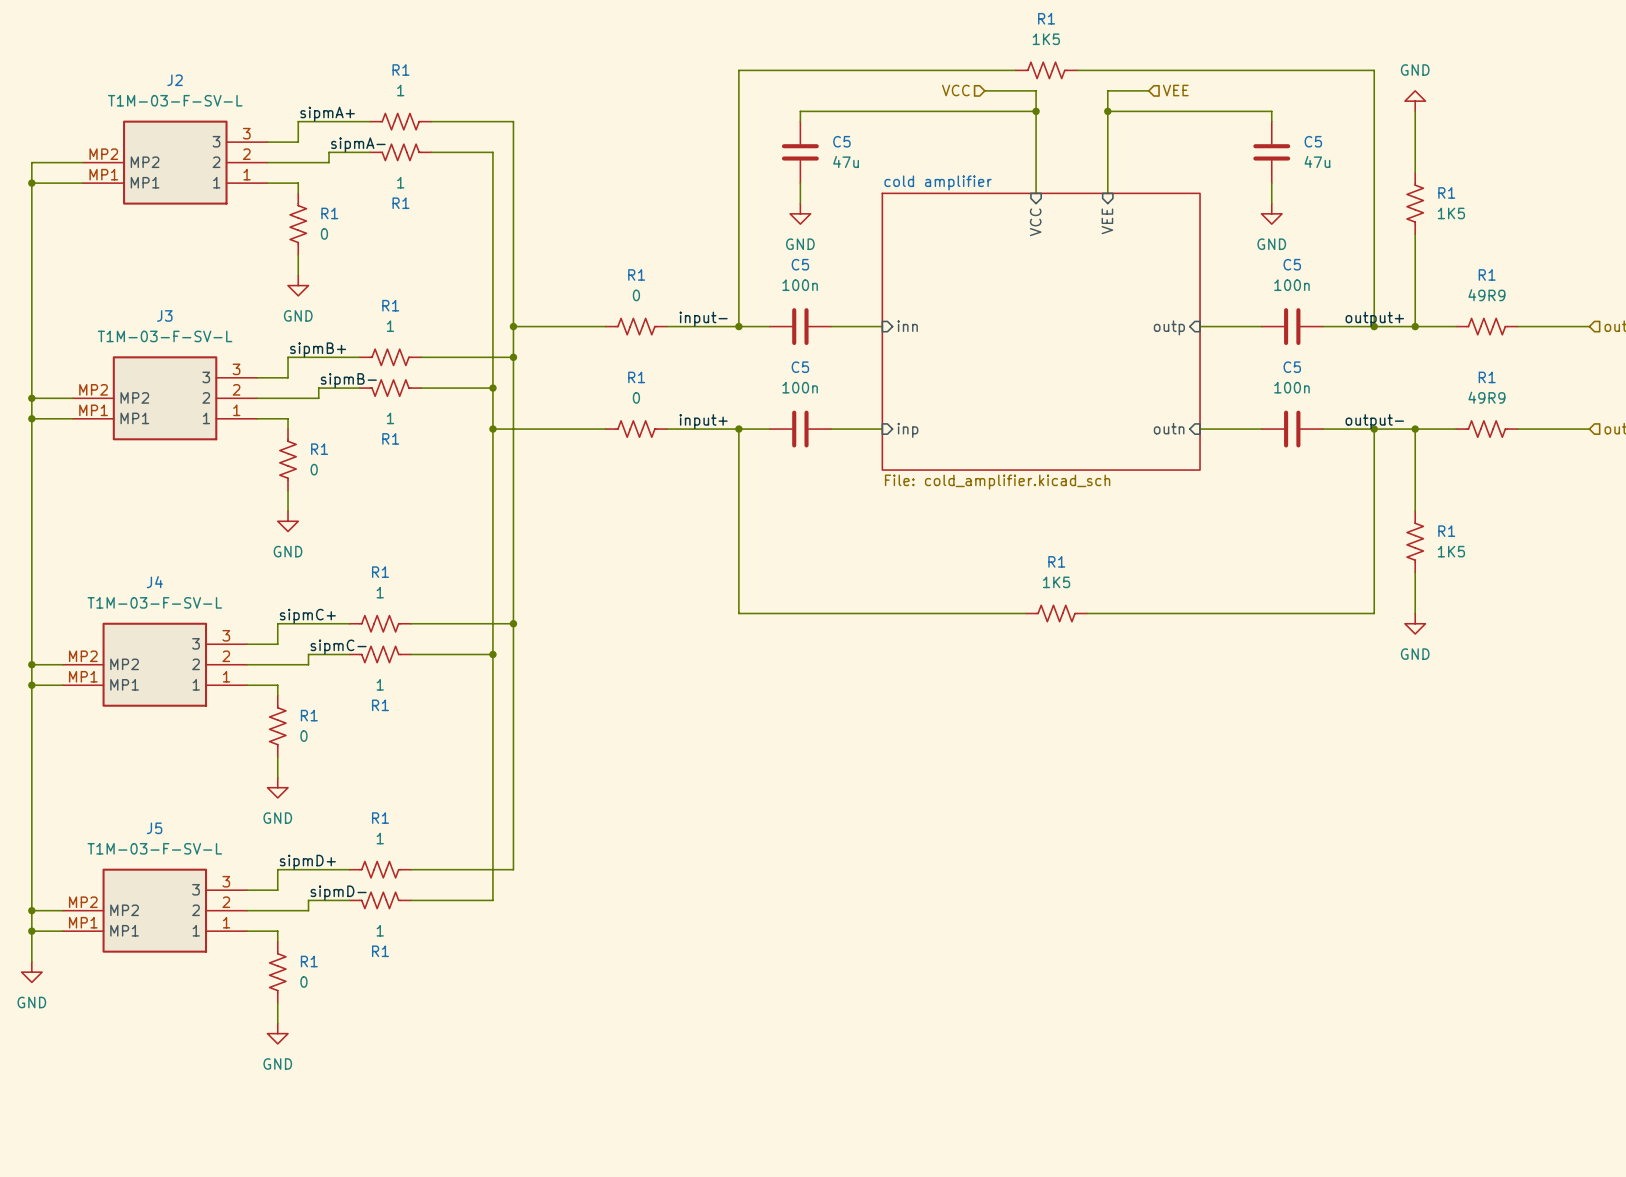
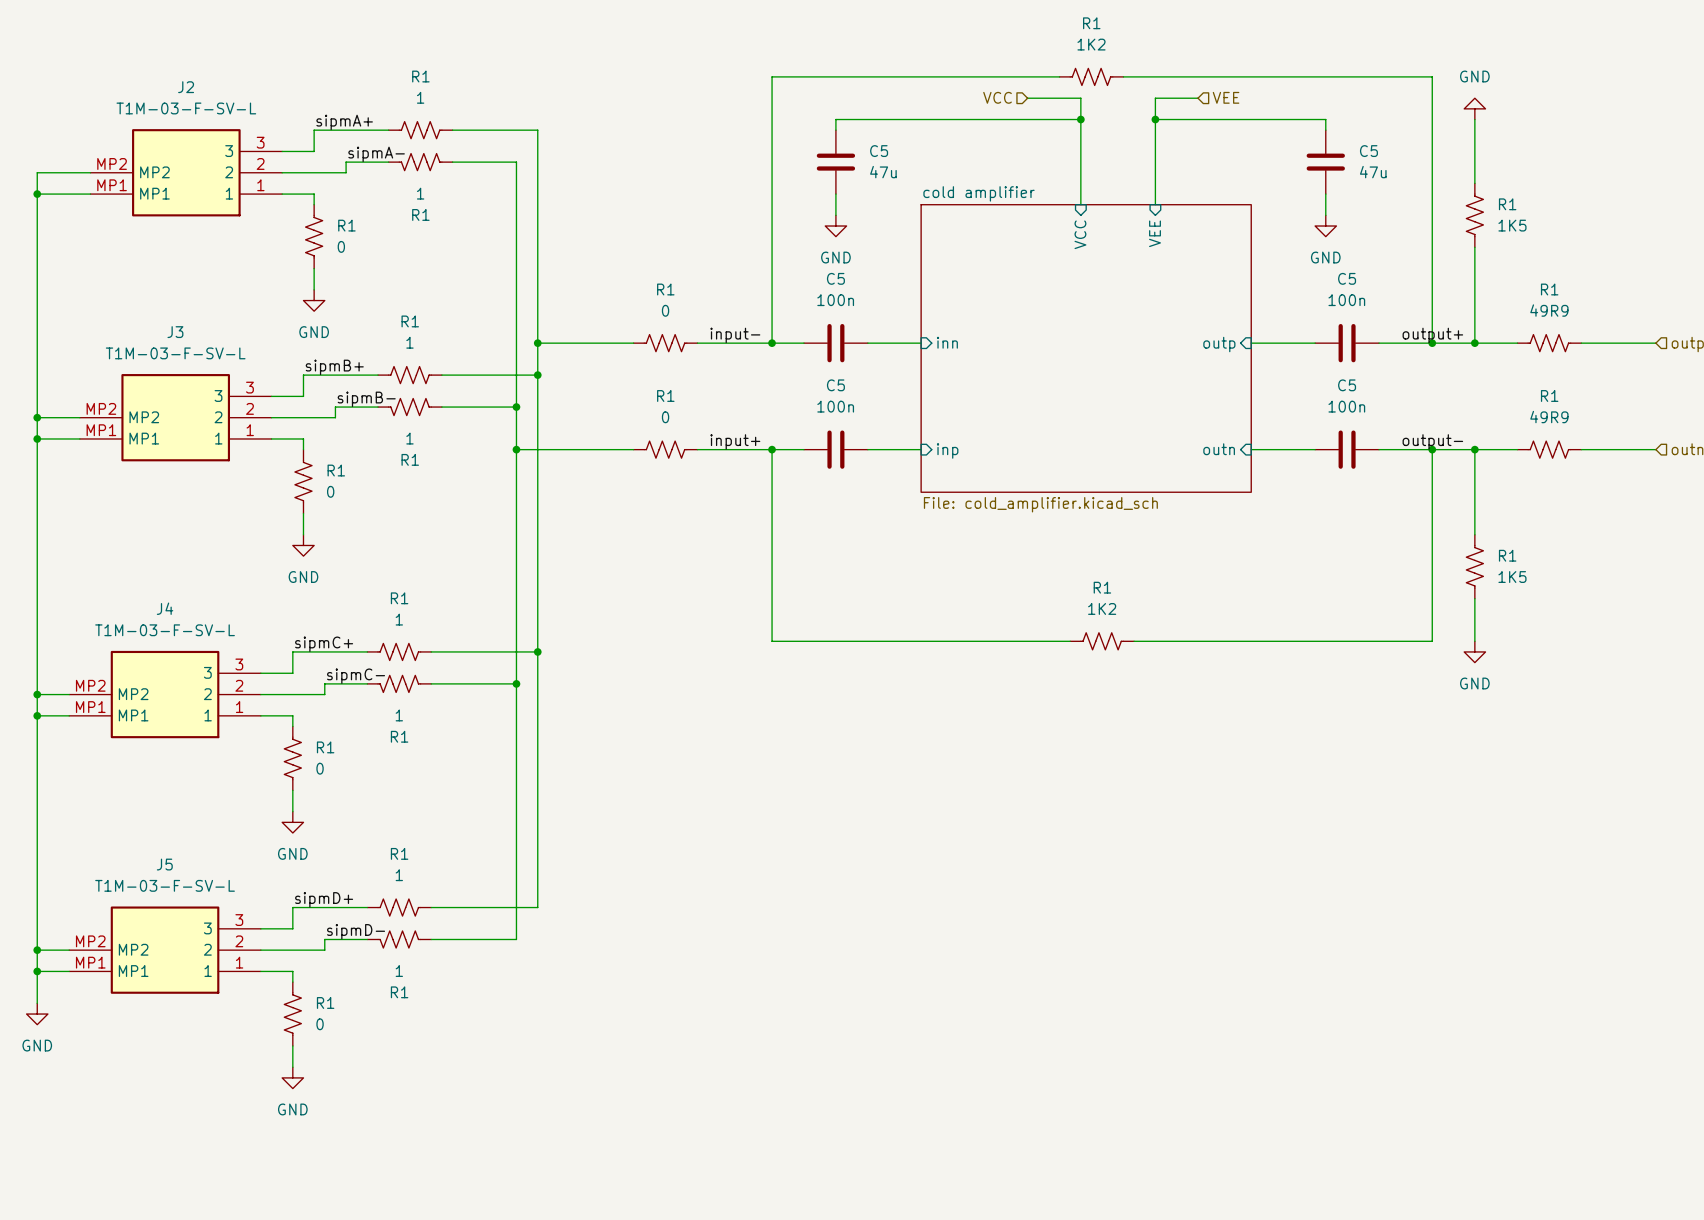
R1 value: 1K5 (1046, 39) -> 1K2 (1091, 44)
R1 value: 1K5 (1056, 582) -> 1K2 (1102, 608)

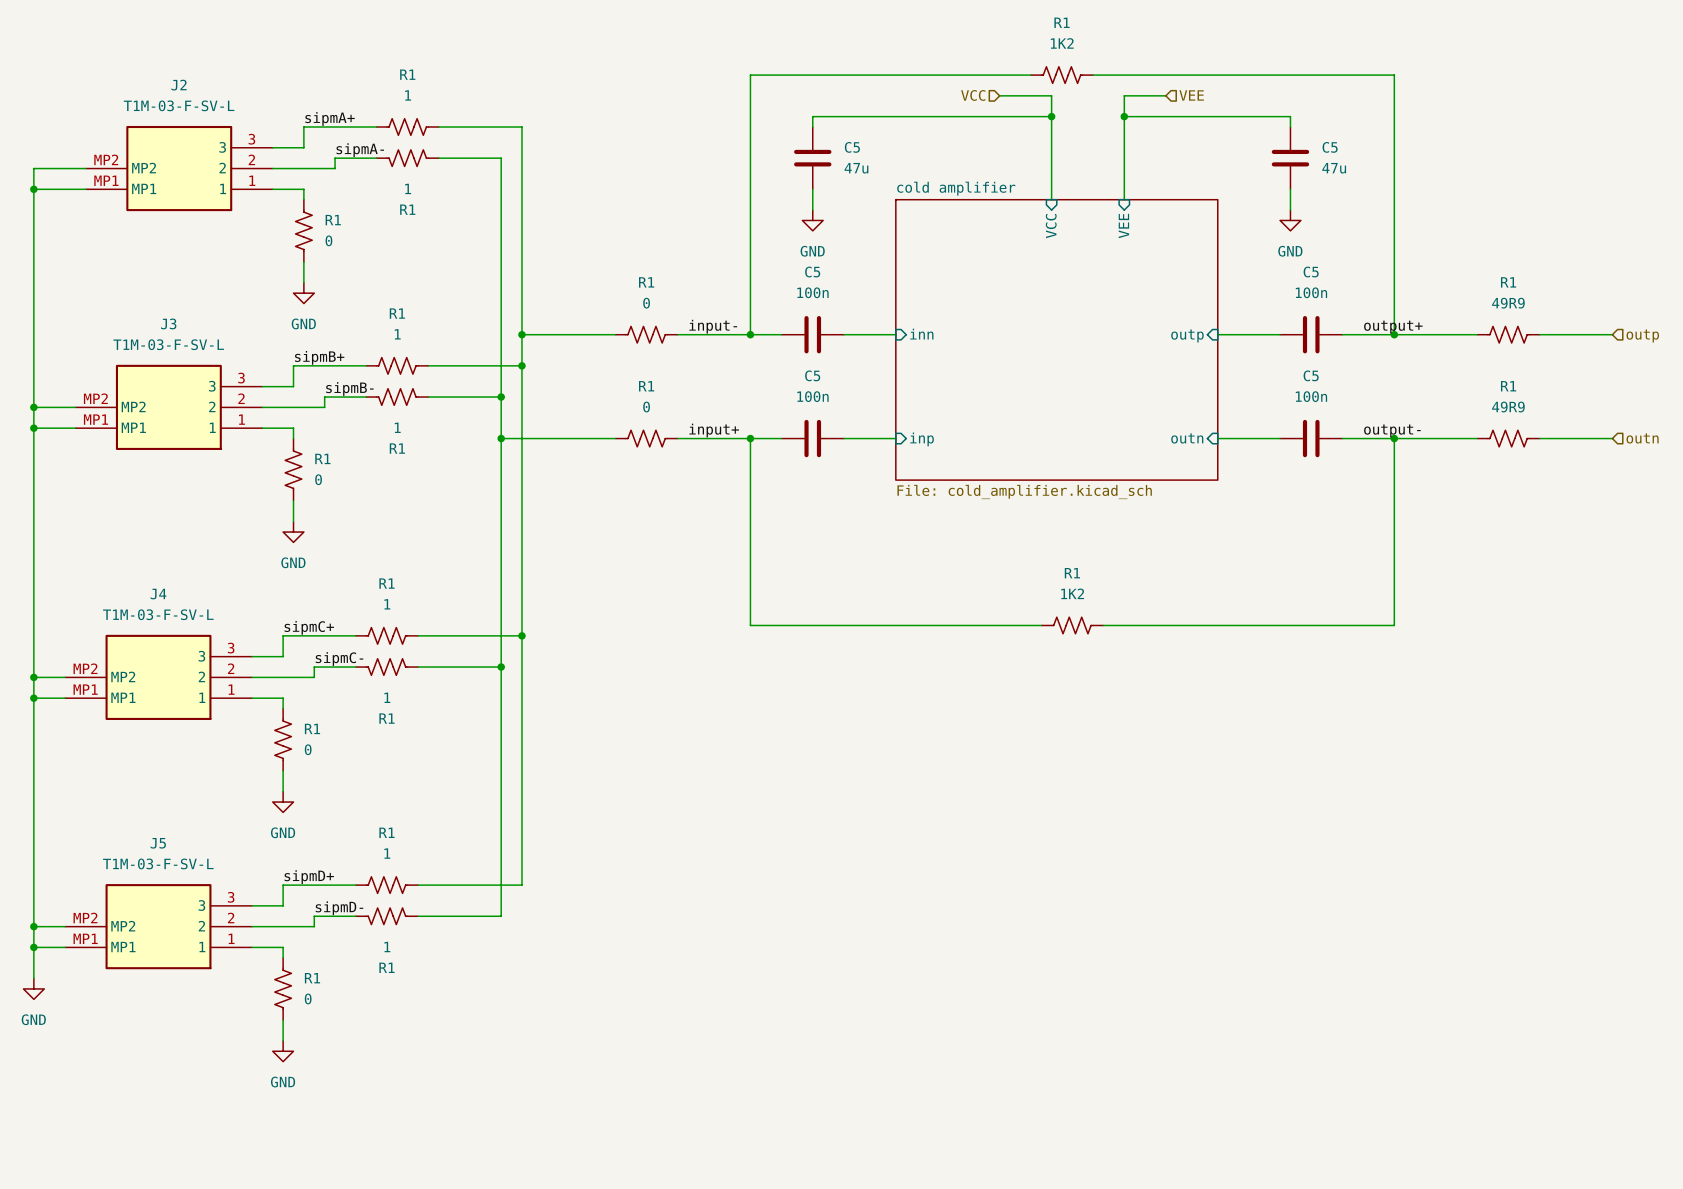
power symbol: GND (1474, 108) -> none
wire: (1474, 119) (1474, 183) -> none
R1: 1K5 (1474, 215) -> none
wire: (1474, 247) (1474, 343) -> none
junction: (1474, 343) -> none
wire: (1474, 449) (1474, 534) -> none
junction: (1474, 449) -> none
R1: 1K5 (1474, 566) -> none
wire: (1474, 598) (1474, 641) -> none
power symbol: GND (1474, 651) -> none

